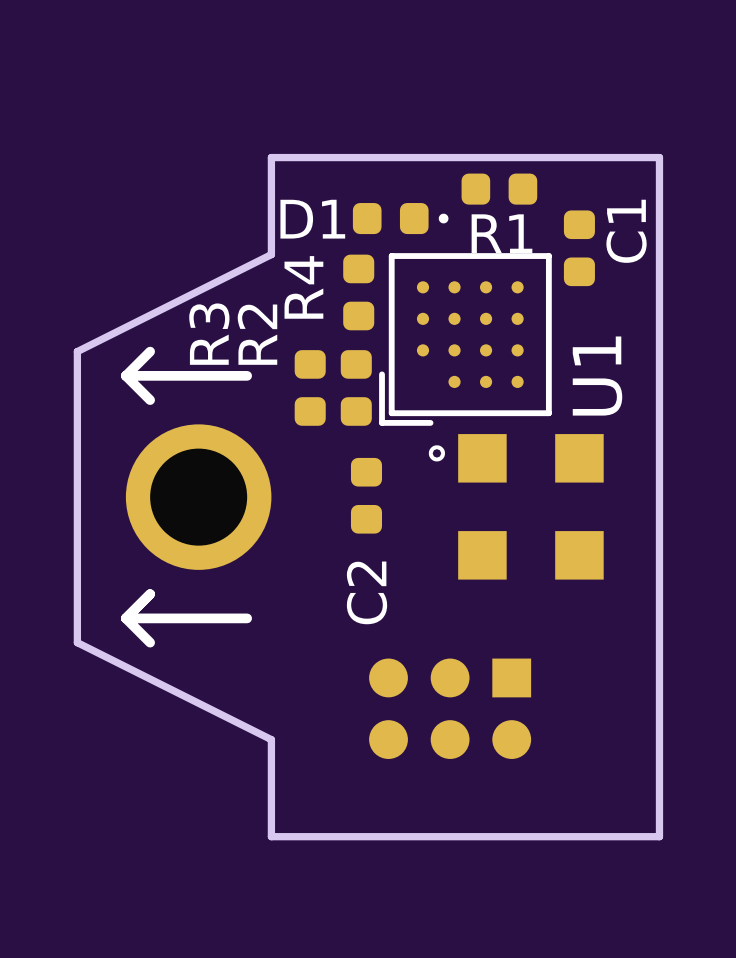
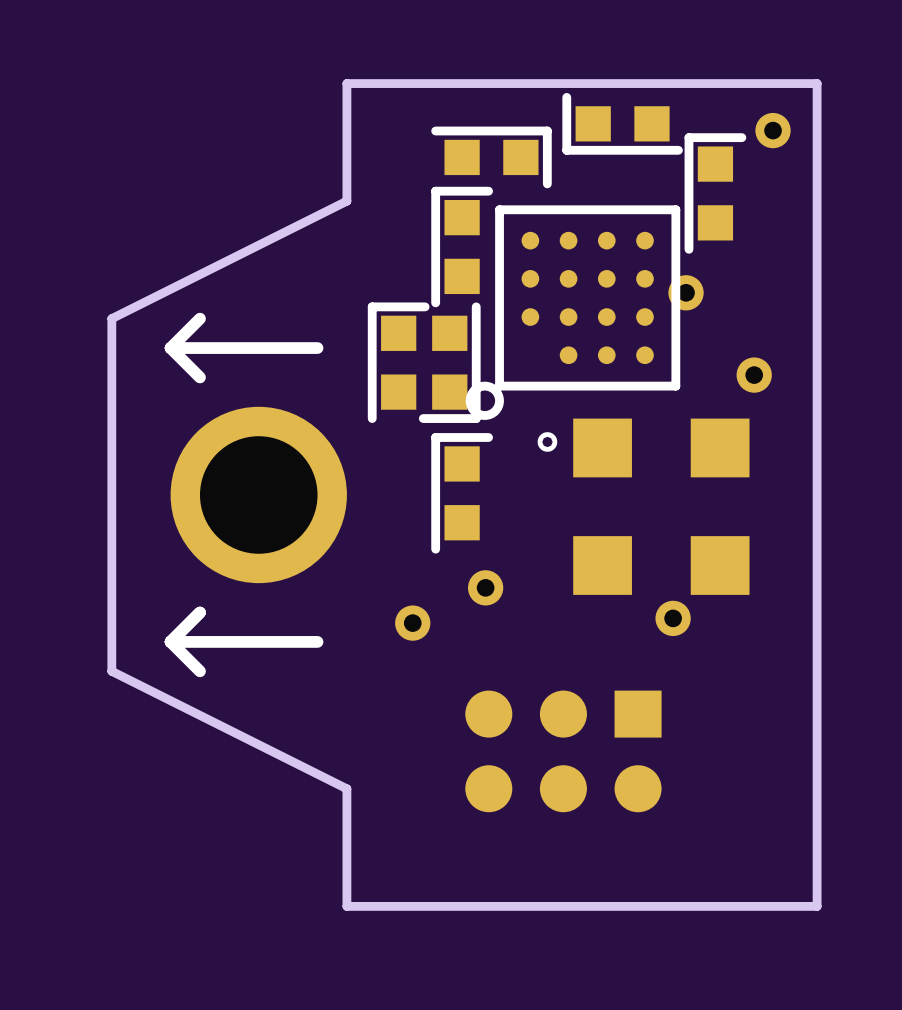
R1: (499, 189) -> none
part: none -> (622, 123)
part: none -> (773, 130)
part: none -> (491, 157)
D1: (400, 218) -> none
part: none -> (715, 193)
C1: (579, 248) -> none
R4: (358, 292) -> none
part: none -> (462, 247)
part: none -> (686, 292)
U1: (465, 339) -> none
part: none -> (572, 312)
R3: (310, 387) -> none
part: none -> (398, 362)
R2: (356, 387) -> none
part: none -> (449, 362)
part: none -> (754, 375)
C2: (366, 495) -> none
part: none -> (462, 493)
part: none -> (485, 587)
part: none -> (673, 618)
part: none -> (412, 623)

